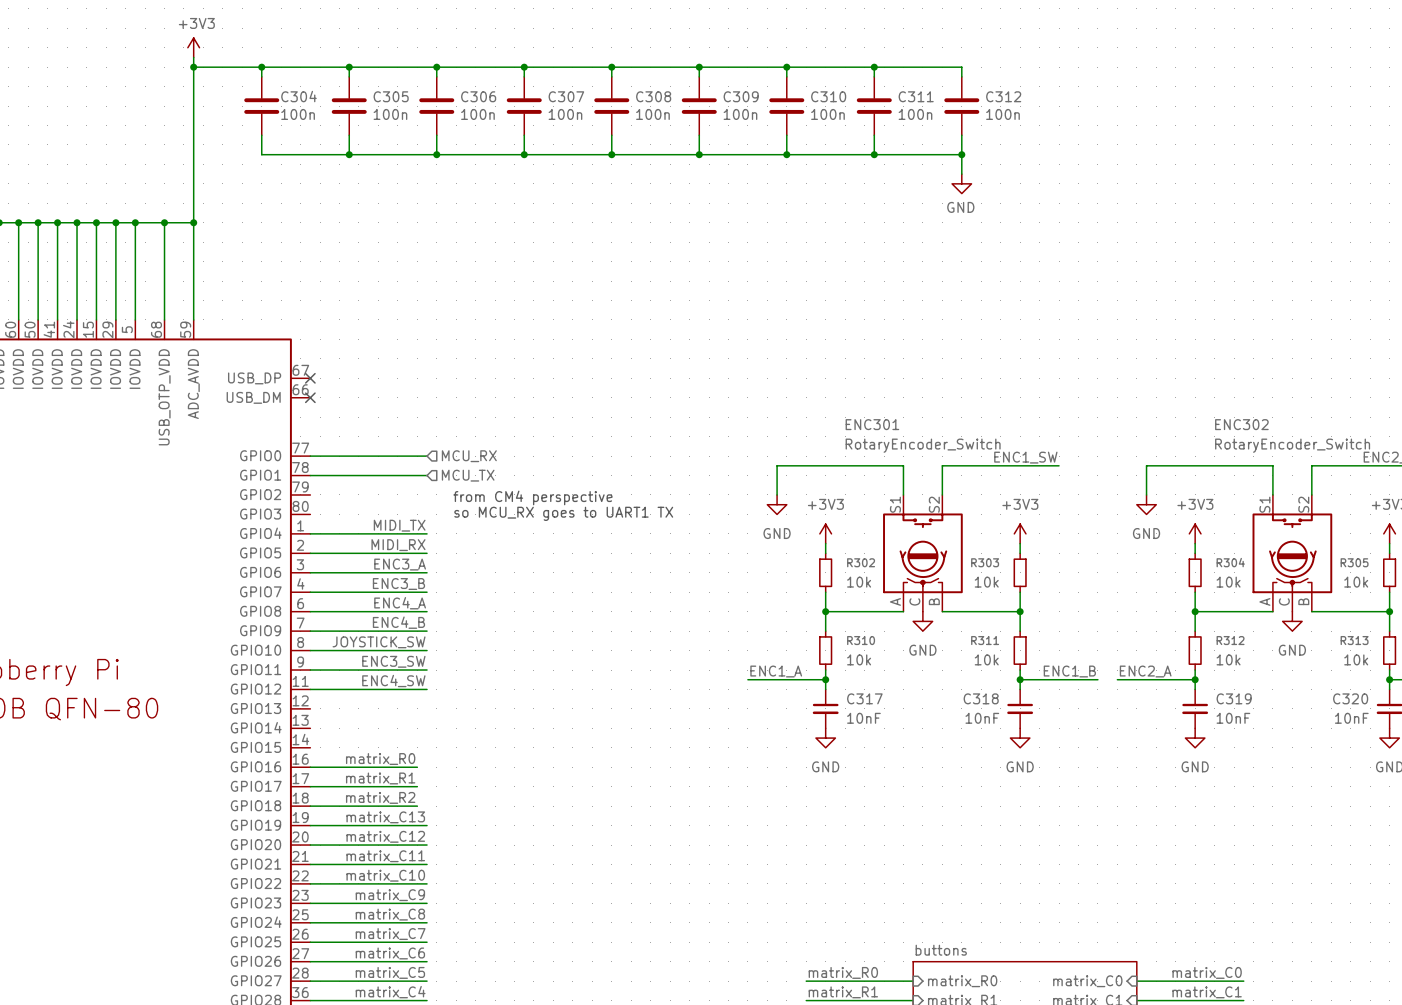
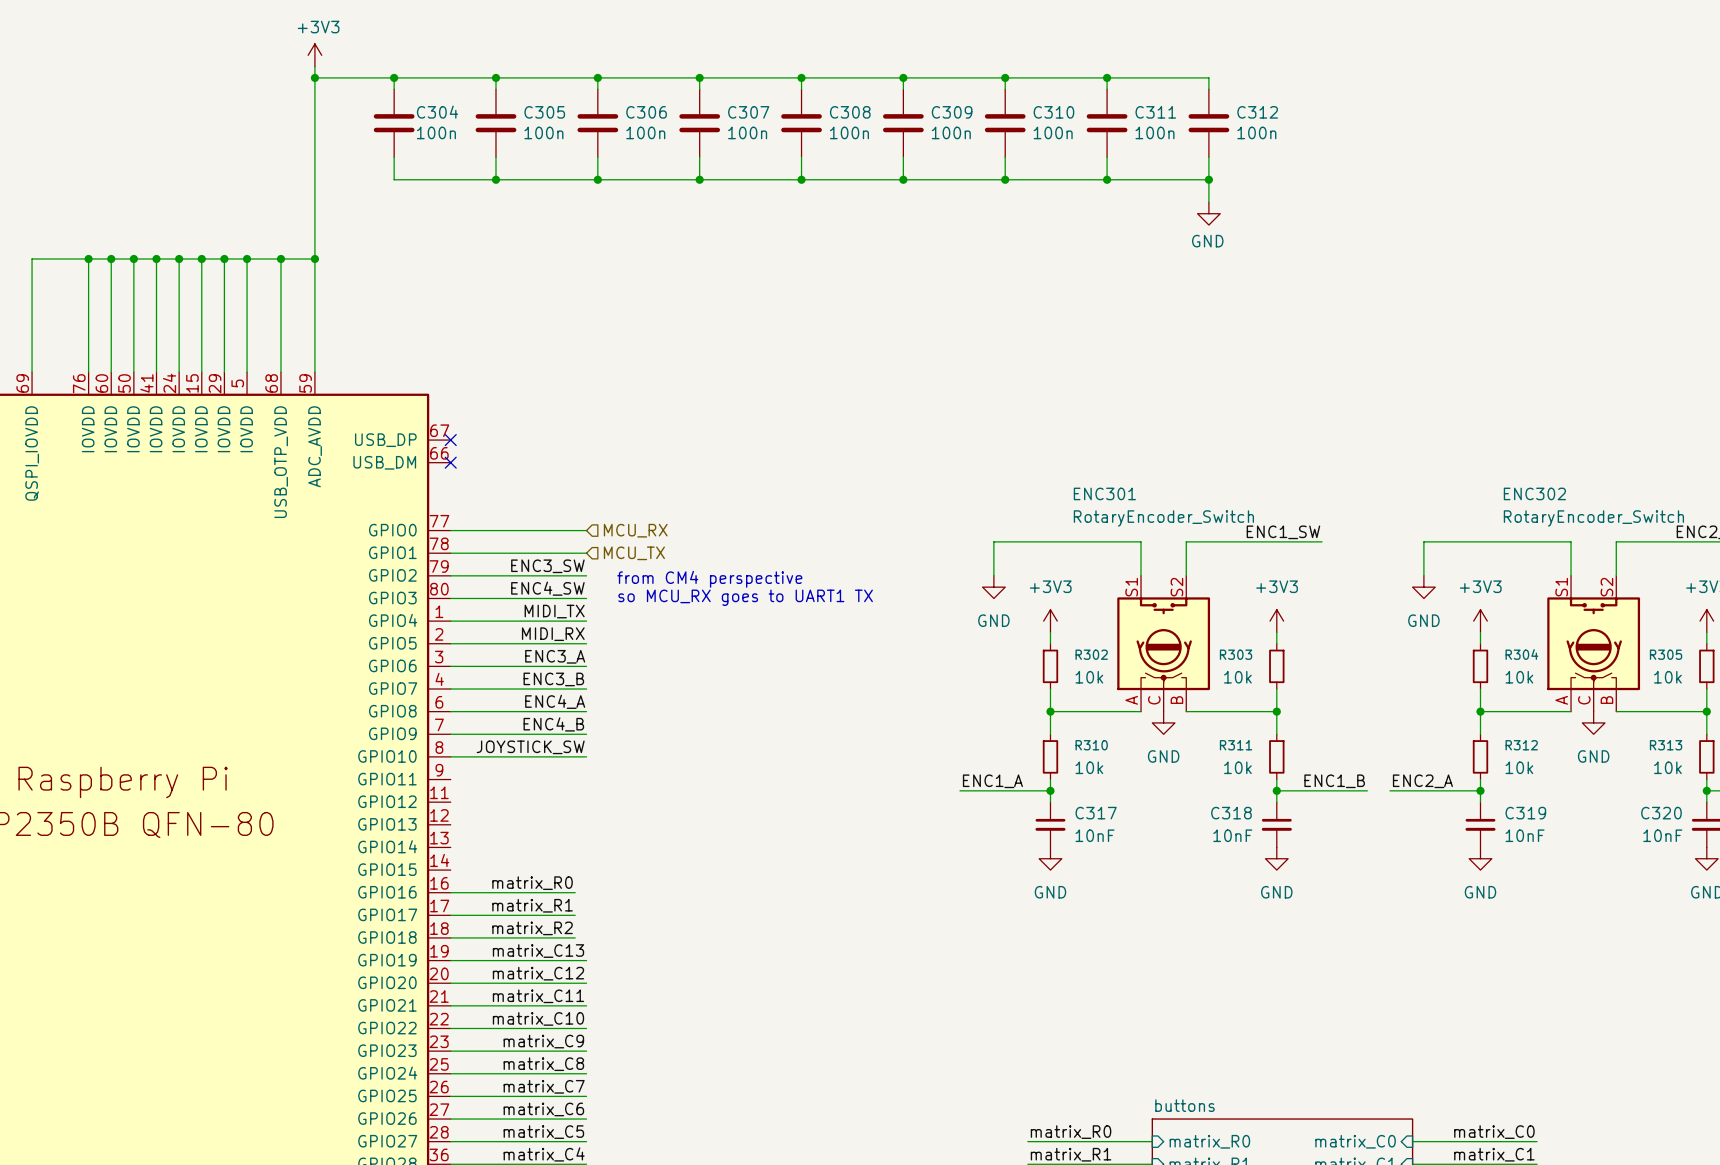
wire: none -> (450, 575) (586, 575)
label position: ENC3_SW (393, 661) -> ENC3_SW (547, 566)
wire: (310, 670) (427, 670) -> (450, 598) (586, 598)
label position: ENC4_SW (393, 681) -> ENC4_SW (547, 588)
wire: (310, 689) (427, 689) -> none

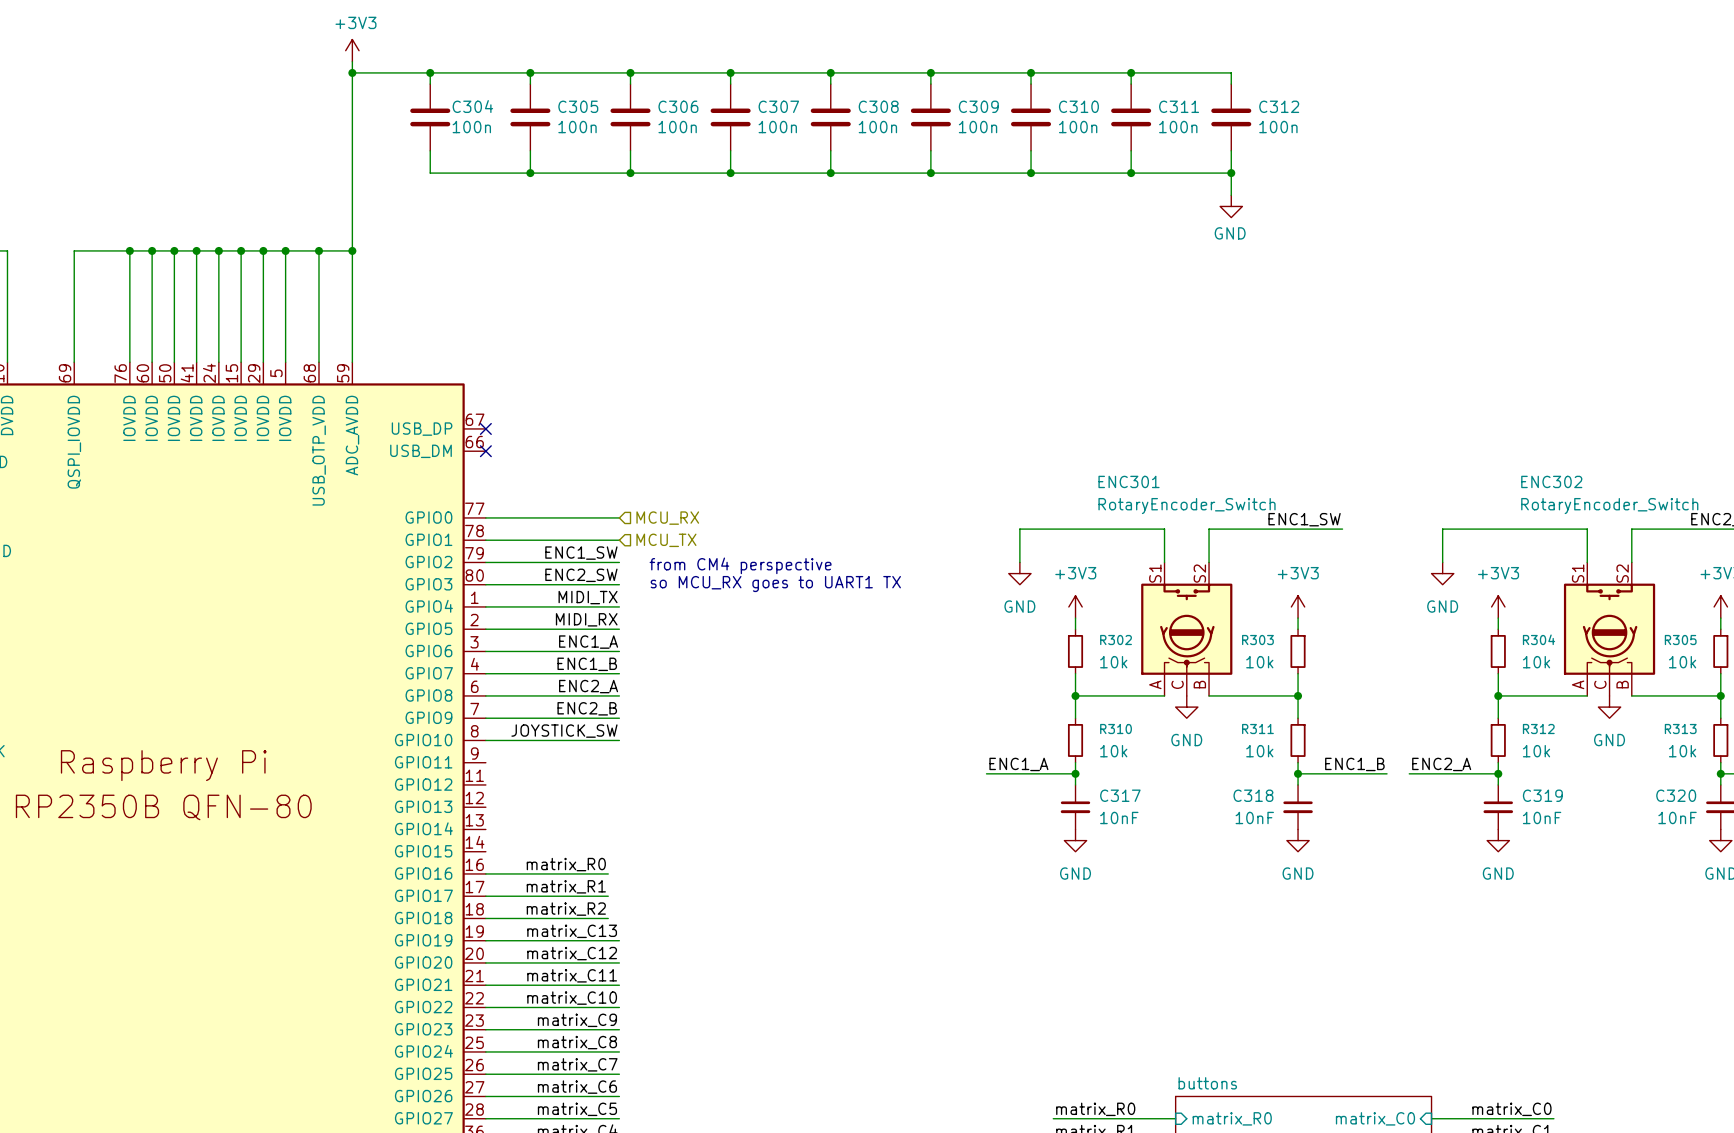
label: ENC3_SW (547, 566) -> ENC1_SW (581, 553)
label: ENC4_SW (547, 588) -> ENC2_SW (581, 575)
label: ENC3_A (555, 656) -> ENC1_A (588, 642)
label: ENC3_B (553, 679) -> ENC1_B (587, 664)
label: ENC4_A (555, 701) -> ENC2_A (588, 686)
label: ENC4_B (553, 724) -> ENC2_B (587, 708)

